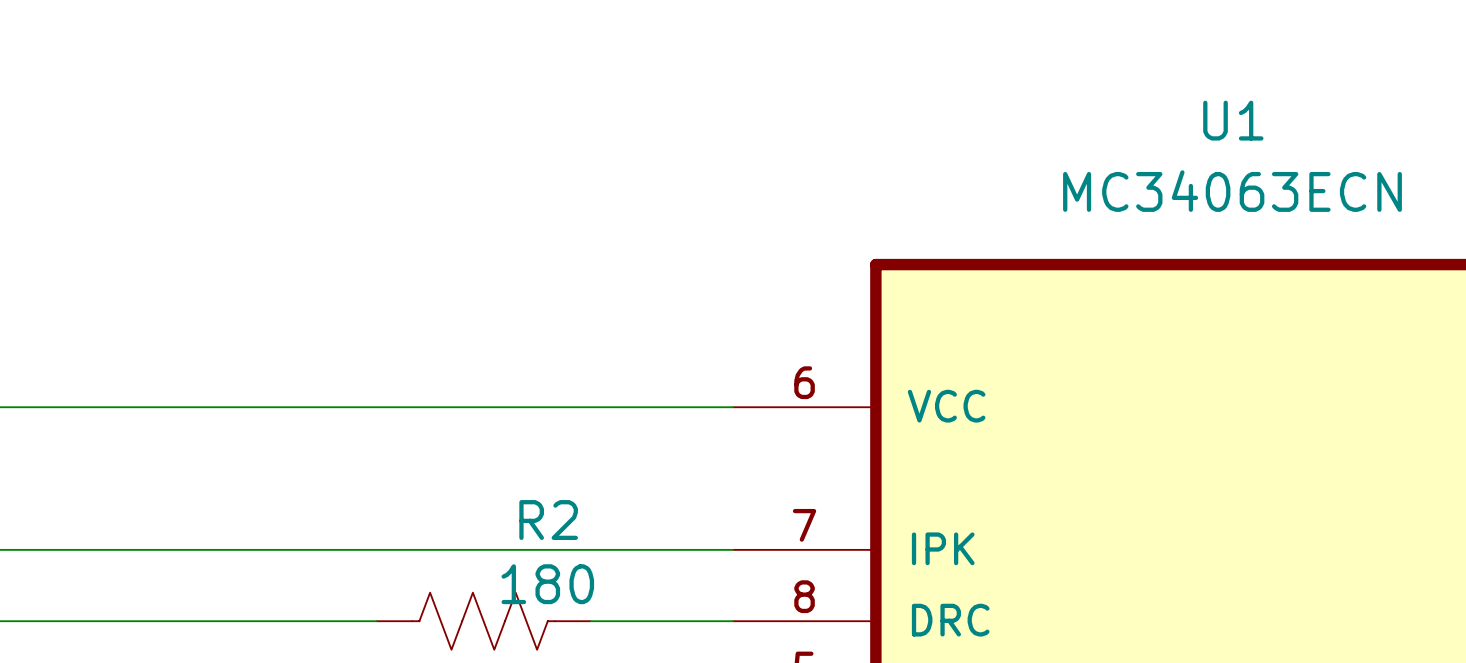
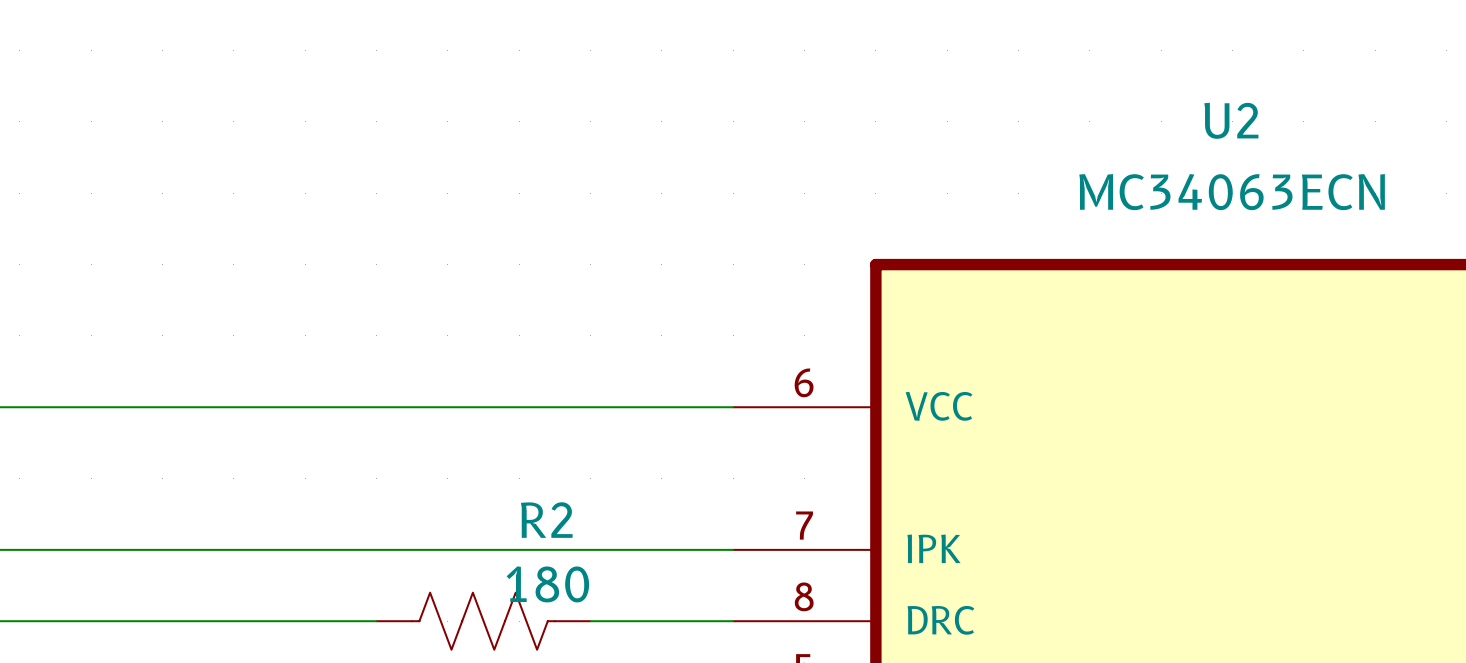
U1 name: U1 (1233, 120) -> U2 (1231, 120)

